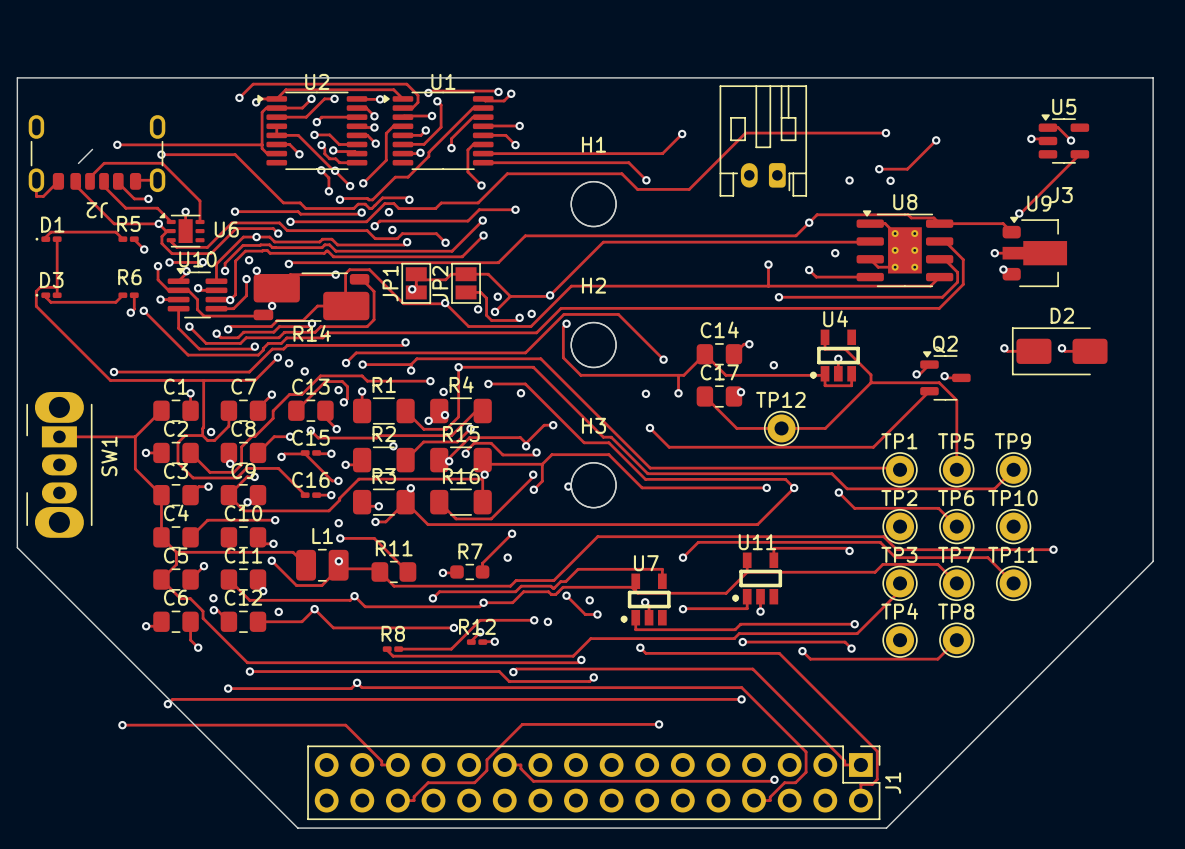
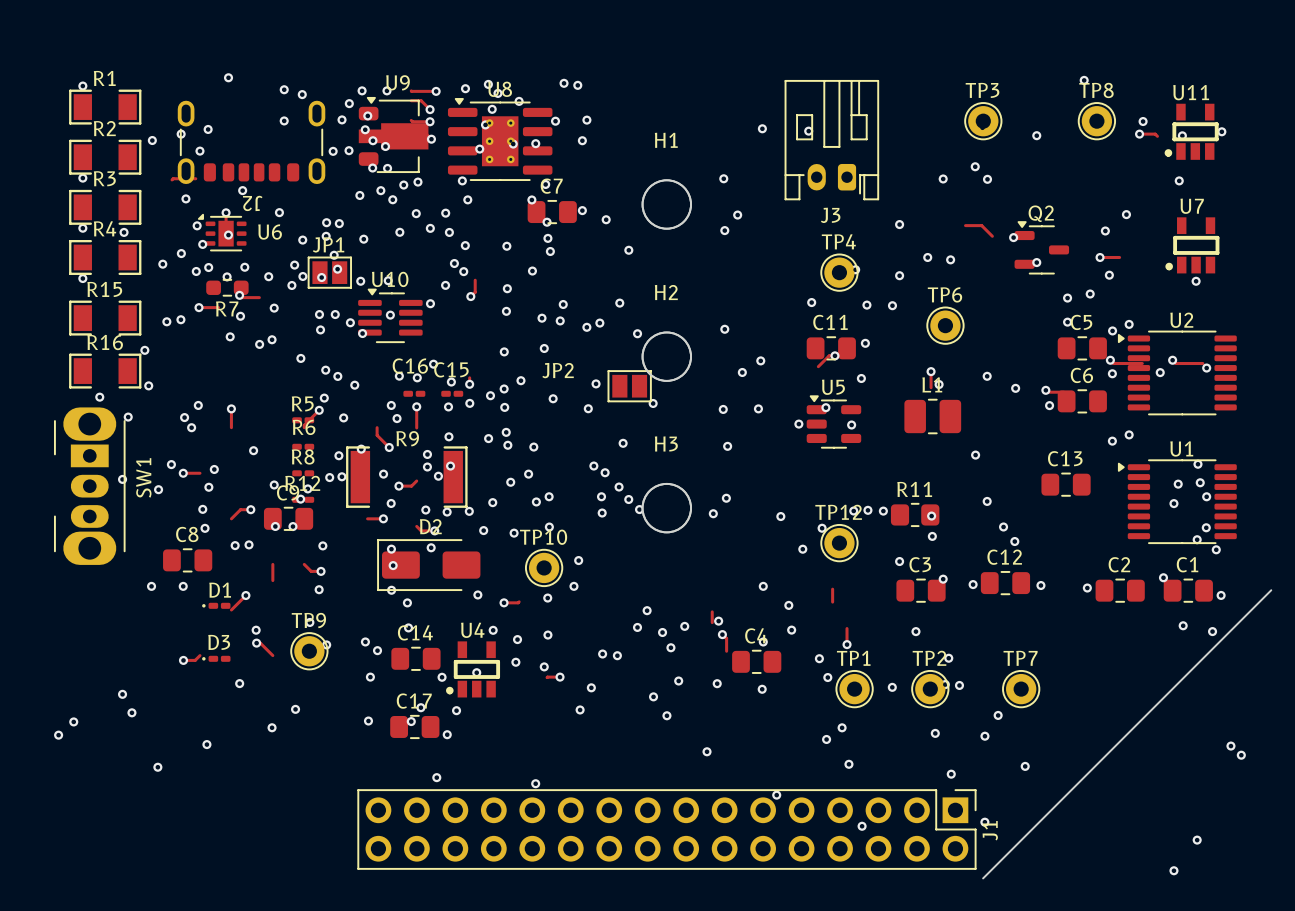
via: none -> (228, 77)
via: none -> (1084, 80)
track: (498, 91) (430, 91) (428, 92) -> none
track: (511, 93) (504, 101) (485, 101) (483, 98) -> none
via: none -> (82, 86)
via: none -> (465, 88)
track: (239, 97) (253, 84) (406, 84) (418, 95) (418, 102) (412, 108) (402, 108) -> none
track: (311, 98) (302, 108) (266, 108) (262, 112) (262, 148) (267, 153) (276, 153) -> none
track: (334, 98) (324, 98) (306, 117) (276, 117) -> none
track: (402, 98) (393, 89) (285, 89) (276, 98) (259, 98) (256, 102) -> none
track: (437, 101) (441, 105) (441, 127) (424, 144) (403, 144) -> none
via: none -> (519, 101)
track: (483, 108) (473, 108) (428, 152) (428, 156) (408, 177) (395, 177) (372, 199) (339, 199) -> none
via: none -> (349, 103)
track: (432, 116) (402, 117) -> none
track: (357, 117) (321, 117) (316, 122) -> none
track: (483, 117) (473, 117) (451, 138) (451, 148) -> none
via: none -> (342, 119)
track: (519, 125) (483, 126) -> none
via: none -> (284, 120)
track: (276, 126) (276, 135) (298, 135) (350, 186) -> none
track: (402, 126) (393, 126) (386, 133) (386, 160) (363, 183) -> none
via: none -> (555, 121)
via: none -> (1143, 121)
track: (1047, 127) (1058, 127) (1071, 140) -> none
U2 position: (312, 130) -> (1177, 372)
track: (425, 130) (420, 135) (402, 135) -> none
U1 position: (438, 130) -> (1177, 501)
track: (885, 133) (745, 133) (689, 189) (637, 189) (621, 173) (507, 173) (478, 202) (441, 202) (435, 208) (398, 208) (393, 203) (384, 203) (366, 221) (290, 221) -> none
via: none -> (208, 129)
track: (314, 134) (329, 134) (339, 144) (357, 144) -> none
track: (682, 134) (662, 153) (483, 153) -> none
track: (483, 135) (505, 135) (515, 145) -> none
via: none -> (808, 131)
via: none -> (1221, 131)
via: none -> (181, 134)
U5 position: (1063, 139) -> (833, 421)
track: (936, 140) (907, 169) (879, 169) -> none
J3 position: (763, 141) -> (831, 140)
track: (117, 144) (262, 144) -> none
track: (276, 144) (289, 144) (299, 154) -> none
track: (483, 144) (473, 144) (467, 149) (467, 171) (481, 185) -> none
track: (321, 145) (324, 148) (324, 153) (329, 158) (335, 158) (339, 162) (357, 162) -> none
via: none -> (535, 143)
board edge: (92, 149) (78, 163) -> none
track: (333, 150) (354, 151) (357, 153) -> none
J2 position: (97, 153) -> (251, 142)
track: (161, 154) (235, 154) (283, 202) (300, 202) (305, 208) (353, 208) (358, 204) (365, 204) (371, 208) (382, 197) (407, 197) (409, 199) -> none
via: none -> (333, 151)
track: (1079, 154) (1019, 213) -> none
track: (483, 162) (628, 162) (646, 180) -> none
track: (321, 170) (328, 177) (328, 191) -> none
via: none -> (82, 178)
track: (36, 180) (36, 196) (43, 196) (58, 181) -> none
track: (75, 181) (75, 185) (114, 223) (158, 223) (166, 231) (171, 231) -> none
track: (89, 181) (89, 177) (104, 163) (162, 163) (200, 201) (200, 221) -> none
track: (104, 181) (104, 186) (125, 208) (157, 208) (171, 221) -> none
track: (118, 181) (134, 198) (148, 198) -> none
via: none -> (462, 180)
via: none -> (1179, 180)
via: none -> (242, 190)
via: none -> (359, 195)
J3 name position: J3 (1062, 195) -> J3 (830, 215)
via: none -> (531, 199)
track: (515, 209) (479, 209) (467, 221) (379, 221) (374, 226) -> none
track: (235, 211) (298, 211) (300, 214) (360, 214) (361, 212) -> none
via: none -> (737, 215)
via: none -> (606, 219)
via: none -> (326, 222)
track: (482, 220) (452, 251) (335, 251) (329, 244) (324, 244) (322, 247) (243, 245) (225, 263) (225, 270) -> none
via: none -> (82, 228)
via: none -> (724, 230)
via: none -> (1105, 230)
via: none -> (124, 232)
via: none -> (399, 232)
track: (167, 231) (161, 236) (161, 243) (171, 253) (211, 253) (236, 228) (273, 228) (278, 233) -> none
via: none -> (228, 235)
track: (1011, 232) (1003, 223) (939, 223) (933, 217) (911, 217) (908, 214) (817, 214) (796, 235) (525, 235) (498, 262) (288, 263) -> none
via: none -> (1013, 237)
track: (483, 235) (462, 256) (333, 256) (327, 251) (324, 253) (270, 253) (267, 250) (245, 251) (235, 261) (235, 294) (230, 300) (216, 299) -> none
via: none -> (363, 239)
track: (45, 239) (50, 232) (115, 232) (122, 239) -> none
D1 position: (48, 239) -> (216, 605)
track: (57, 239) (57, 295) -> none
R5 position: (128, 239) -> (303, 420)
track: (134, 239) (144, 249) -> none
track: (171, 240) (176, 247) (207, 247) (231, 222) (279, 222) (287, 230) (367, 230) (375, 238) (397, 238) (402, 233) (436, 233) (445, 242) -> none
via: none -> (202, 244)
track: (870, 241) (603, 242) (549, 296) (510, 296) -> none
track: (939, 241) (945, 241) (963, 259) (963, 284) (939, 308) (561, 308) (536, 332) (327, 332) (322, 337) (286, 337) (281, 343) (268, 343) (258, 355) (188, 355) (143, 310) -> none
track: (407, 242) (404, 244) (337, 244) (331, 239) (322, 239) (319, 242) (274, 242) (269, 237) (243, 237) (216, 264) (216, 281) -> none
via: none -> (628, 250)
via: none -> (550, 251)
U8 position: (904, 248) -> (500, 139)
via: none -> (334, 255)
U9 position: (1034, 251) -> (393, 134)
via: none -> (950, 259)
via: none -> (1036, 262)
via: none -> (454, 263)
via: none -> (162, 264)
track: (870, 259) (878, 267) (895, 267) -> none
track: (939, 259) (944, 259) (957, 272) (957, 282) (942, 297) (778, 297) -> none
track: (202, 262) (169, 262) -> none
track: (768, 264) (768, 286) -> none
via: none -> (532, 271)
track: (158, 266) (158, 279) (168, 290) (188, 290) (197, 299) (197, 309) (203, 316) (263, 314) -> none
via: none -> (463, 271)
track: (809, 270) (816, 277) (870, 277) -> none
track: (186, 271) (178, 281) -> none
via: none -> (321, 277)
via: none -> (82, 278)
track: (335, 274) (290, 274) (276, 288) -> none
via: none -> (360, 281)
via: none -> (1196, 281)
track: (939, 277) (930, 286) (571, 286) (531, 326) (468, 326) (445, 303) (403, 303) (369, 269) (349, 269) (345, 273) (346, 306) (317, 306) (303, 320) (277, 320) (271, 326) (230, 326) (228, 329) -> none
track: (246, 279) (246, 295) (233, 308) (216, 308) -> none
track: (359, 279) (374, 291) (374, 319) (367, 326) (320, 326) (315, 332) (284, 332) (279, 337) (246, 337) (240, 343) (206, 343) (189, 326) -> none
via: none -> (445, 285)
track: (416, 279) (445, 279) (451, 274) (488, 274) (510, 296) -> none
via: none -> (507, 288)
JP1 rotation: 0° (416, 283) -> 90° clockwise (329, 272)
JP1 position: (416, 283) -> (329, 272)
JP2 name position: JP2 (440, 283) -> JP2 (558, 370)
JP2 rotation: 0° (466, 283) -> 90° clockwise (629, 386)
JP2 position: (466, 283) -> (629, 386)
via: none -> (1090, 294)
track: (57, 287) (40, 287) (36, 291) (36, 306) (110, 380) (254, 380) (277, 357) -> none
via: none -> (1067, 298)
track: (466, 292) (480, 292) (486, 298) (486, 315) (491, 320) (516, 320) (519, 317) -> none
U10 position: (197, 293) -> (390, 315)
via: none -> (811, 302)
track: (45, 295) (50, 302) (115, 302) (122, 295) -> none
D3 position: (48, 295) -> (216, 658)
R6 position: (128, 295) -> (303, 446)
track: (134, 295) (134, 309) (130, 312) -> none
via: none -> (430, 303)
track: (510, 296) (494, 311) -> none
R14: (311, 297) -> none
via: none -> (892, 305)
via: none -> (335, 314)
via: none -> (390, 315)
via: none -> (240, 316)
track: (178, 308) (178, 328) (199, 349) (252, 349) (254, 346) -> none
via: none -> (350, 322)
via: none -> (1067, 322)
via: none -> (1129, 324)
via: none -> (724, 329)
via: none -> (320, 329)
via: none -> (1112, 330)
track: (312, 323) (308, 326) (279, 326) (273, 332) (243, 332) (238, 337) (220, 337) (216, 333) -> none
track: (566, 323) (563, 326) (563, 357) (580, 375) (683, 375) (704, 354) (725, 375) (825, 375) -> none
via: none -> (865, 343)
via: none -> (544, 348)
track: (825, 337) (825, 349) (845, 349) (871, 374) (871, 382) -> none
via: none -> (144, 350)
via: none -> (504, 351)
track: (405, 342) (402, 345) (287, 345) (283, 349) (272, 349) (249, 372) (113, 372) -> none
via: (405, 342) -> none
via: none -> (760, 360)
via: none -> (433, 364)
D2 position: (1059, 351) -> (428, 565)
C14 position: (719, 354) -> (415, 658)
U4 position: (834, 355) -> (473, 669)
via: none -> (1206, 368)
track: (663, 359) (618, 314) (563, 314) (525, 352) (356, 352) (346, 363) -> none
via: none -> (1160, 372)
via: none -> (1112, 373)
via: none -> (987, 376)
track: (362, 364) (411, 364) (416, 358) (540, 358) (650, 468) (898, 468) (900, 469) -> none
track: (929, 364) (919, 374) (916, 374) -> none
via: none -> (451, 382)
via: none -> (596, 383)
via: none -> (939, 384)
track: (825, 373) (825, 385) (851, 385) (851, 373) -> none
via: none -> (504, 388)
track: (678, 375) (678, 393) -> none
Q2 position: (945, 375) -> (1041, 247)
track: (203, 380) (202, 435) -> none
track: (430, 381) (367, 381) (362, 375) (320, 375) (301, 394) (289, 394) (273, 410) (273, 418) (241, 447) (241, 464) (233, 472) (209, 472) (190, 452) -> none
via: none -> (99, 397)
track: (871, 382) (825, 428) (736, 428) (704, 396) -> none
track: (871, 382) (939, 382) (956, 400) (956, 469) -> none
via: none -> (324, 398)
track: (488, 383) (525, 383) (584, 442) (608, 442) (645, 479) (785, 479) (794, 487) (757, 524) (428, 524) (405, 502) -> none
via: none -> (469, 403)
via: none -> (653, 403)
via: none -> (198, 405)
via: none -> (1049, 405)
via: none -> (448, 406)
track: (929, 391) (873, 447) (669, 447) (649, 428) -> none
C17 position: (719, 396) -> (414, 726)
R1 footprint: [353, 397, 415, 425] -> [69, 89, 142, 125]
R4 footprint: [430, 397, 492, 425] -> [69, 239, 142, 275]
via: none -> (128, 417)
via: none -> (184, 417)
via: none -> (343, 417)
track: (343, 402) (347, 398) (347, 386) (342, 381) (325, 381) (296, 410) -> none
via: none -> (798, 424)
via: none -> (851, 425)
via: none -> (191, 427)
track: (161, 410) (135, 436) -> none
C1 position: (176, 410) -> (1188, 590)
track: (228, 410) (228, 426) (214, 440) (207, 440) (202, 435) -> none
C7 position: (243, 410) -> (552, 212)
C13 position: (310, 410) -> (1066, 484)
track: (405, 411) (423, 429) (446, 429) (458, 416) (458, 367) (533, 367) (603, 437) (611, 437) (647, 473) (831, 473) (847, 488) (994, 488) (1013, 469) -> none
track: (482, 411) (476, 411) (451, 435) (318, 438) (310, 430) -> none
via: none -> (1129, 434)
via: none -> (448, 436)
via: none -> (1112, 441)
track: (553, 425) (544, 425) (526, 443) -> none
via: none -> (507, 445)
track: (470, 428) (457, 441) (423, 441) (405, 460) -> none
TP12 position: (781, 428) -> (839, 543)
track: (202, 435) (185, 435) (177, 442) (177, 462) (193, 477) (236, 477) (246, 468) (278, 468) (305, 495) -> none
via: none -> (427, 454)
track: (59, 436) (135, 436) -> none
track: (135, 436) (135, 469) (161, 495) (161, 537) (176, 552) -> none
track: (290, 436) (274, 436) (258, 452) -> none
via: none -> (975, 455)
C15 name position: C15 (310, 437) -> C15 (451, 369)
track: (526, 443) (520, 437) (469, 437) (447, 460) (439, 460) (449, 461) -> none
via: none -> (171, 464)
via: none -> (1197, 464)
R2 footprint: [353, 446, 415, 474] -> [69, 139, 142, 175]
R15 footprint: [430, 446, 492, 474] -> [69, 300, 142, 336]
via: none -> (427, 467)
via: none -> (214, 469)
C2 position: (176, 452) -> (1120, 590)
C8 position: (243, 452) -> (187, 560)
C15 position: (310, 452) -> (452, 393)
track: (316, 452) (331, 453) -> none
track: (536, 452) (534, 454) (502, 454) (491, 443) (474, 443) (465, 453) -> none
track: (305, 453) (332, 480) (338, 480) -> none
track: (305, 453) (284, 453) (281, 456) -> none
via: none -> (438, 476)
via: none -> (341, 476)
R9: none -> (406, 477)
via: none -> (122, 479)
via: none -> (1200, 482)
via: none -> (1178, 484)
track: (542, 464) (542, 481) (533, 489) -> none
track: (542, 464) (551, 454) (608, 454) (642, 487) (766, 487) -> none
track: (542, 464) (486, 464) (482, 460) (482, 472) (484, 474) (482, 476) (482, 502) -> none
via: none -> (208, 487)
via: none -> (619, 487)
via: none -> (307, 488)
via: none -> (158, 489)
TP1 position: (900, 469) -> (854, 689)
TP5: (956, 469) -> none
TP9 position: (1013, 469) -> (309, 651)
track: (533, 474) (533, 476) (491, 518) (456, 518) (439, 502) -> none
via: none -> (1206, 496)
track: (254, 476) (247, 476) (228, 495) (244, 510) (328, 510) (358, 479) (482, 479) -> none
via: none -> (726, 498)
via: none -> (628, 499)
C16 name position: C16 (310, 479) -> C16 (410, 366)
via: none -> (536, 501)
via: none -> (987, 501)
via: none -> (492, 502)
via: none -> (1173, 503)
via: none -> (202, 509)
via: none -> (425, 510)
via: none -> (867, 510)
R3 footprint: [353, 488, 415, 516] -> [69, 189, 142, 225]
via: none -> (447, 512)
R16 footprint: [430, 488, 492, 516] -> [69, 353, 142, 389]
via: none -> (713, 513)
track: (838, 492) (854, 508) (938, 508) (956, 526) -> none
via: none -> (780, 516)
C3 position: (176, 495) -> (921, 590)
C16 position: (310, 495) -> (414, 393)
via: none -> (275, 526)
track: (405, 502) (385, 521) (375, 521) -> none
via: none -> (549, 527)
via: none -> (1003, 526)
via: none -> (205, 528)
via: none -> (822, 528)
via: none -> (1206, 527)
via: none -> (483, 530)
via: none -> (514, 533)
via: none -> (932, 536)
via: none -> (1197, 539)
via: none -> (1014, 541)
via: none -> (235, 545)
via: none -> (249, 544)
track: (275, 520) (207, 520) (190, 537) -> none
via: none -> (802, 549)
via: none -> (1216, 549)
TP2 position: (900, 526) -> (930, 689)
TP6 position: (956, 526) -> (945, 325)
TP10 position: (1013, 526) -> (544, 567)
track: (512, 533) (482, 563) (482, 571) -> none
via: none -> (899, 561)
C4 position: (176, 537) -> (756, 661)
C10: (243, 537) -> none
track: (340, 538) (374, 538) (407, 571) -> none
track: (1053, 549) (896, 549) (883, 536) (597, 536) (553, 580) (516, 580) (510, 586) (394, 586) (376, 568) (338, 568) -> none
track: (849, 550) (846, 548) (773, 548) (773, 560) -> none
R7 name position: R7 (470, 551) -> R7 (227, 308)
track: (176, 552) (293, 552) (306, 565) -> none
track: (176, 552) (176, 564) (161, 579) (180, 598) (190, 598) (203, 611) (203, 618) (247, 662) (578, 662) (581, 659) -> none
via: none -> (973, 584)
via: none -> (1040, 585)
via: none -> (151, 586)
via: none -> (183, 586)
track: (683, 557) (698, 542) (880, 542) (895, 557) (987, 557) (1013, 583) -> none
via: none -> (1087, 588)
track: (271, 560) (296, 585) (321, 585) (338, 568) -> none
board edge: (1153, 561) (1153, 77) (17, 77) (17, 547) (297, 828) (886, 828) -> none
L1 position: (322, 565) -> (932, 416)
via: none -> (477, 594)
via: none -> (1221, 595)
via: none -> (547, 598)
R11 position: (393, 571) -> (915, 514)
R7 position: (469, 571) -> (227, 287)
via: none -> (407, 602)
via: none -> (788, 605)
U11 position: (757, 578) -> (1191, 131)
C5 position: (176, 579) -> (1082, 348)
track: (228, 579) (249, 600) (350, 600) (354, 596) (365, 606) (479, 606) (483, 602) (512, 602) (523, 591) (548, 591) (551, 594) (555, 594) (563, 587) (631, 587) (637, 593) (726, 593) (747, 572) (875, 572) (882, 564) (937, 564) (956, 583) -> none
C11 position: (243, 579) -> (831, 348)
via: none -> (647, 610)
track: (662, 581) (662, 569) (578, 569) (565, 581) (560, 581) (554, 588) (550, 586) (521, 586) (515, 591) (439, 591) (432, 598) -> none
track: (900, 583) (900, 590) (857, 633) (739, 633) (734, 638) (590, 638) (573, 656) (393, 656) (387, 649) -> none
TP3 position: (900, 583) -> (983, 121)
TP7 position: (956, 583) -> (1021, 689)
TP11: (1013, 583) -> none
via: none -> (718, 621)
via: none -> (684, 626)
via: none -> (1183, 625)
track: (566, 595) (585, 614) (597, 614) -> none
track: (747, 596) (747, 608) (683, 609) -> none
via: none -> (791, 630)
U7 position: (645, 599) -> (1192, 245)
via: none -> (915, 631)
via: none -> (1212, 631)
via: none -> (517, 639)
via: none -> (377, 650)
track: (635, 617) (635, 629) (735, 629) (740, 624) (854, 624) -> none
track: (534, 620) (480, 620) (451, 649) (398, 649) -> none
C6 position: (176, 621) -> (1082, 401)
track: (190, 621) (190, 640) (198, 647) -> none
C12 position: (243, 621) -> (1005, 583)
track: (258, 621) (302, 621) (314, 609) (333, 627) (453, 627) -> none
via: none -> (819, 658)
track: (480, 632) (471, 642) -> none
via: none -> (476, 672)
TP4 position: (900, 640) -> (839, 272)
track: (956, 640) (937, 659) (810, 659) (802, 651) -> none
TP8 position: (956, 640) -> (1096, 121)
via: none -> (370, 677)
via: none -> (442, 677)
R12 position: (477, 642) -> (303, 499)
track: (742, 642) (845, 642) (851, 648) -> none
via: none -> (678, 681)
track: (640, 647) (645, 653) (779, 653) (877, 751) (877, 779) (872, 784) (860, 784) (860, 800) -> none
R8 position: (392, 649) -> (303, 473)
via: none -> (959, 685)
via: none -> (591, 687)
via: none -> (762, 689)
via: none -> (122, 694)
via: none -> (420, 707)
track: (249, 671) (499, 671) (509, 681) (589, 681) (593, 677) -> none
via: none -> (456, 710)
track: (513, 672) (516, 669) (752, 669) (844, 760) (844, 764) (860, 764) -> none
via: none -> (131, 712)
via: none -> (998, 715)
via: none -> (368, 721)
via: none -> (73, 721)
track: (228, 688) (351, 688) (357, 682) (361, 687) (741, 687) (806, 751) (806, 772) (795, 782) (784, 782) (770, 797) (770, 800) (754, 800) -> none
via: none -> (842, 727)
via: none -> (935, 733)
via: none -> (58, 735)
via: none -> (447, 734)
via: none -> (984, 736)
track: (741, 699) (172, 699) (167, 704) -> none
via: none -> (1230, 746)
via: none -> (707, 751)
via: none -> (1241, 755)
via: none -> (848, 764)
track: (659, 724) (522, 724) (486, 759) (486, 770) (474, 782) (428, 782) (414, 796) (414, 800) (397, 800) -> none
via: (659, 724) -> none
via: none -> (1025, 766)
track: (122, 725) (345, 725) (381, 761) (381, 764) (397, 764) -> none
via: none -> (951, 774)
via: none -> (436, 777)
via: none -> (535, 783)
via: none -> (776, 795)
track: (504, 764) (520, 764) (520, 768) (533, 781) (774, 779) -> none
via: none -> (984, 822)
via: none -> (1197, 840)
via: none -> (1173, 870)

